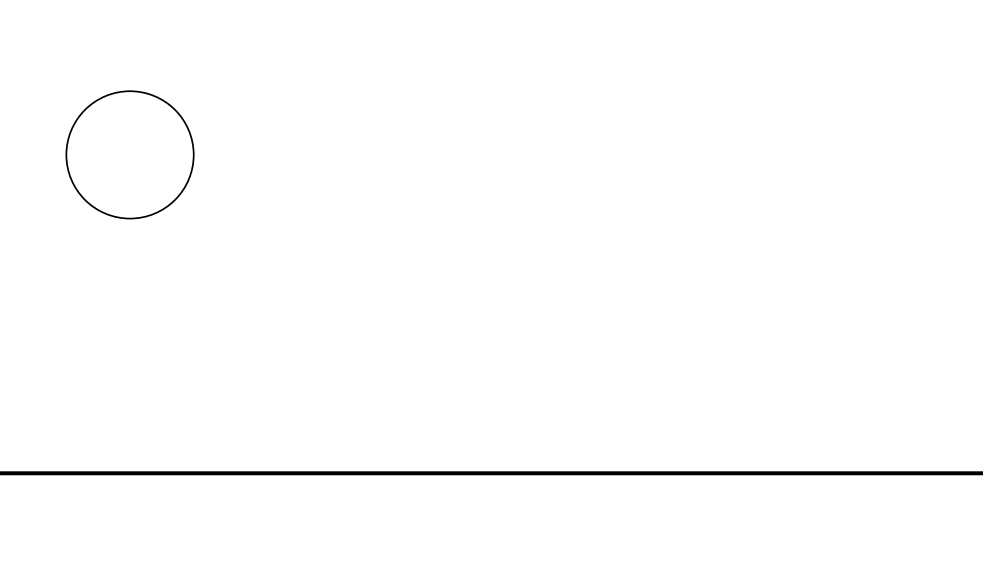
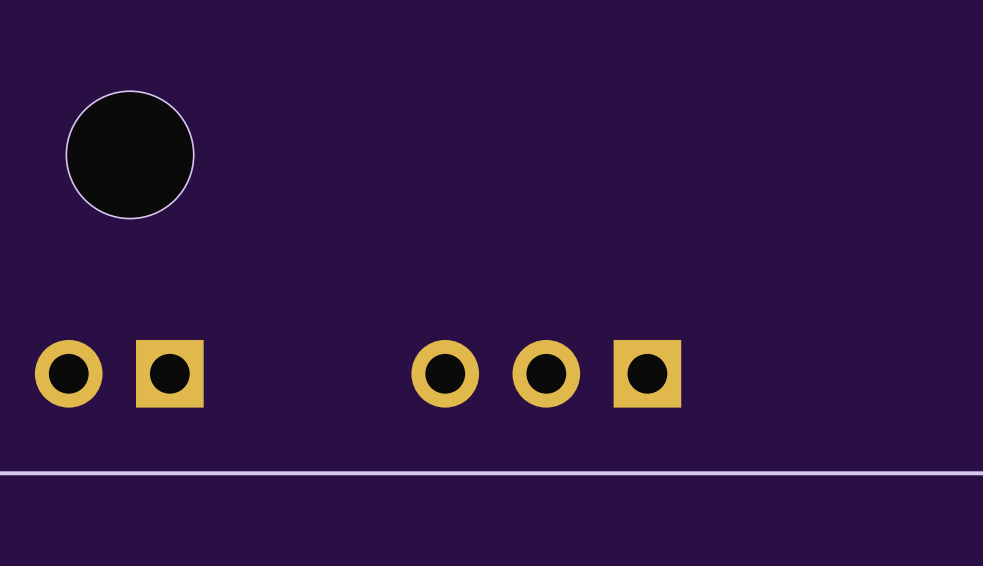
part: none -> (119, 373)
part: none -> (546, 373)

